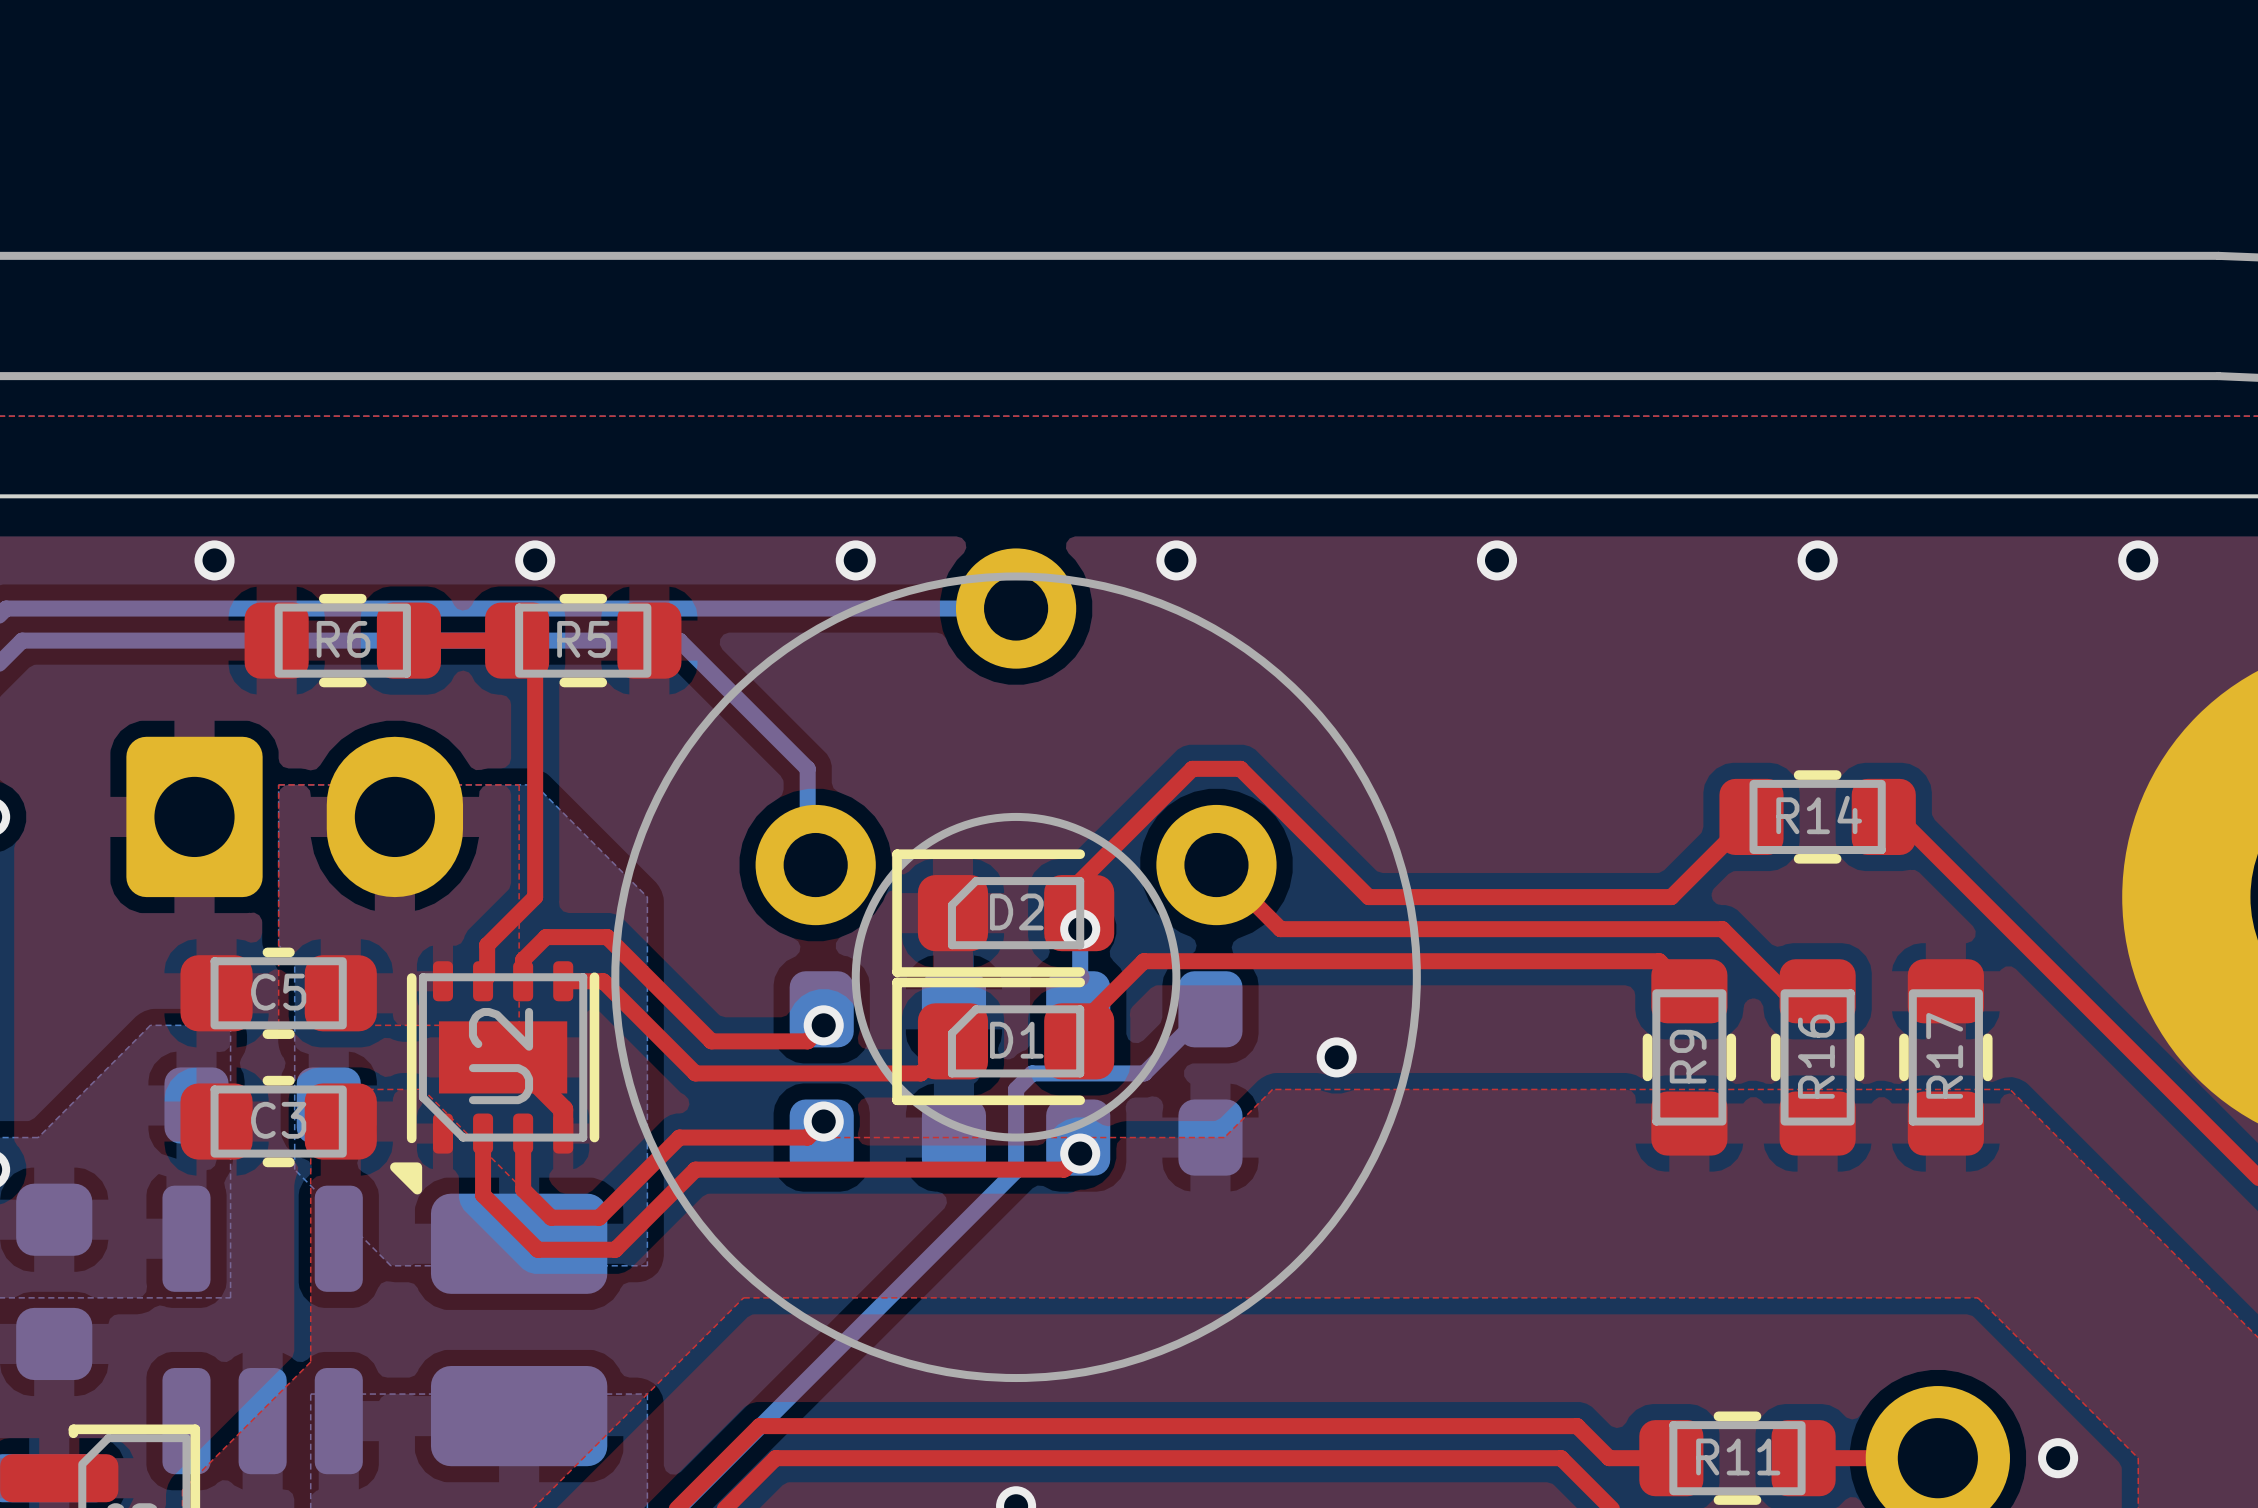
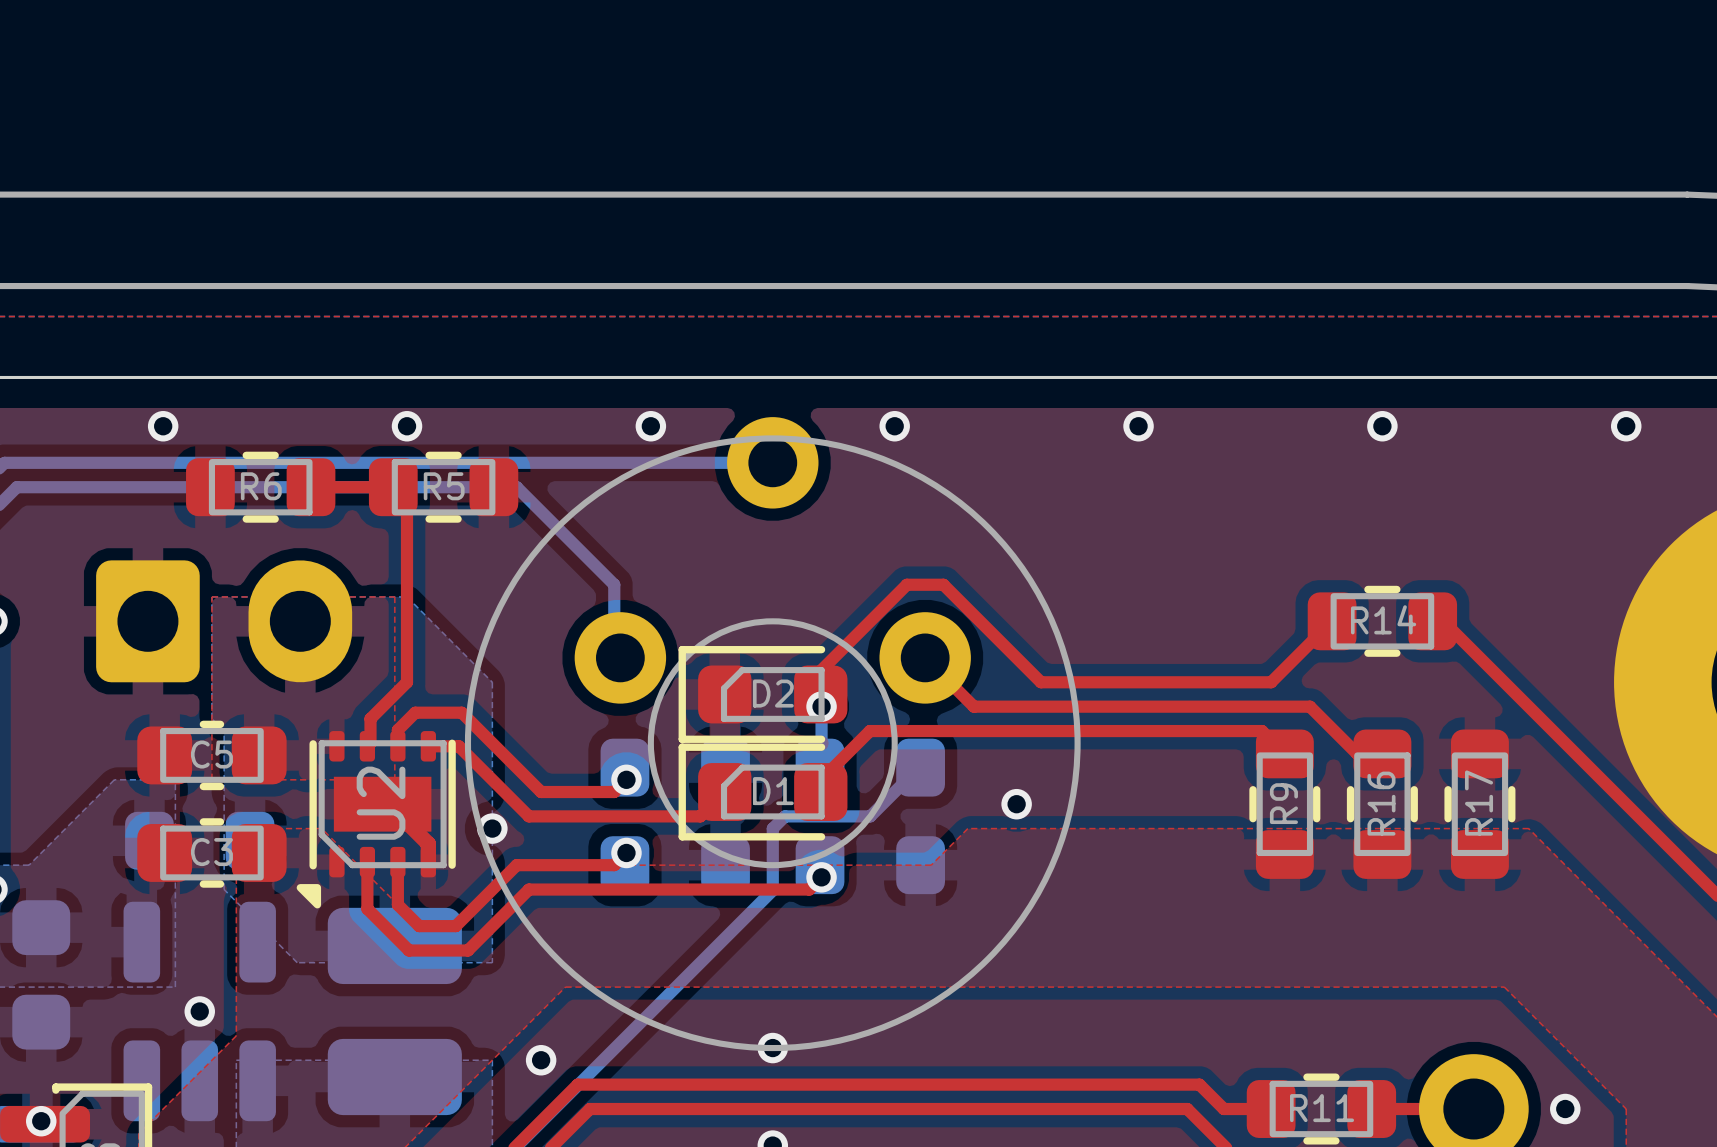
via: none -> (492, 828)
via: none -> (199, 1011)
via: none -> (772, 1048)
via: none -> (541, 1060)
via: none -> (41, 1121)

